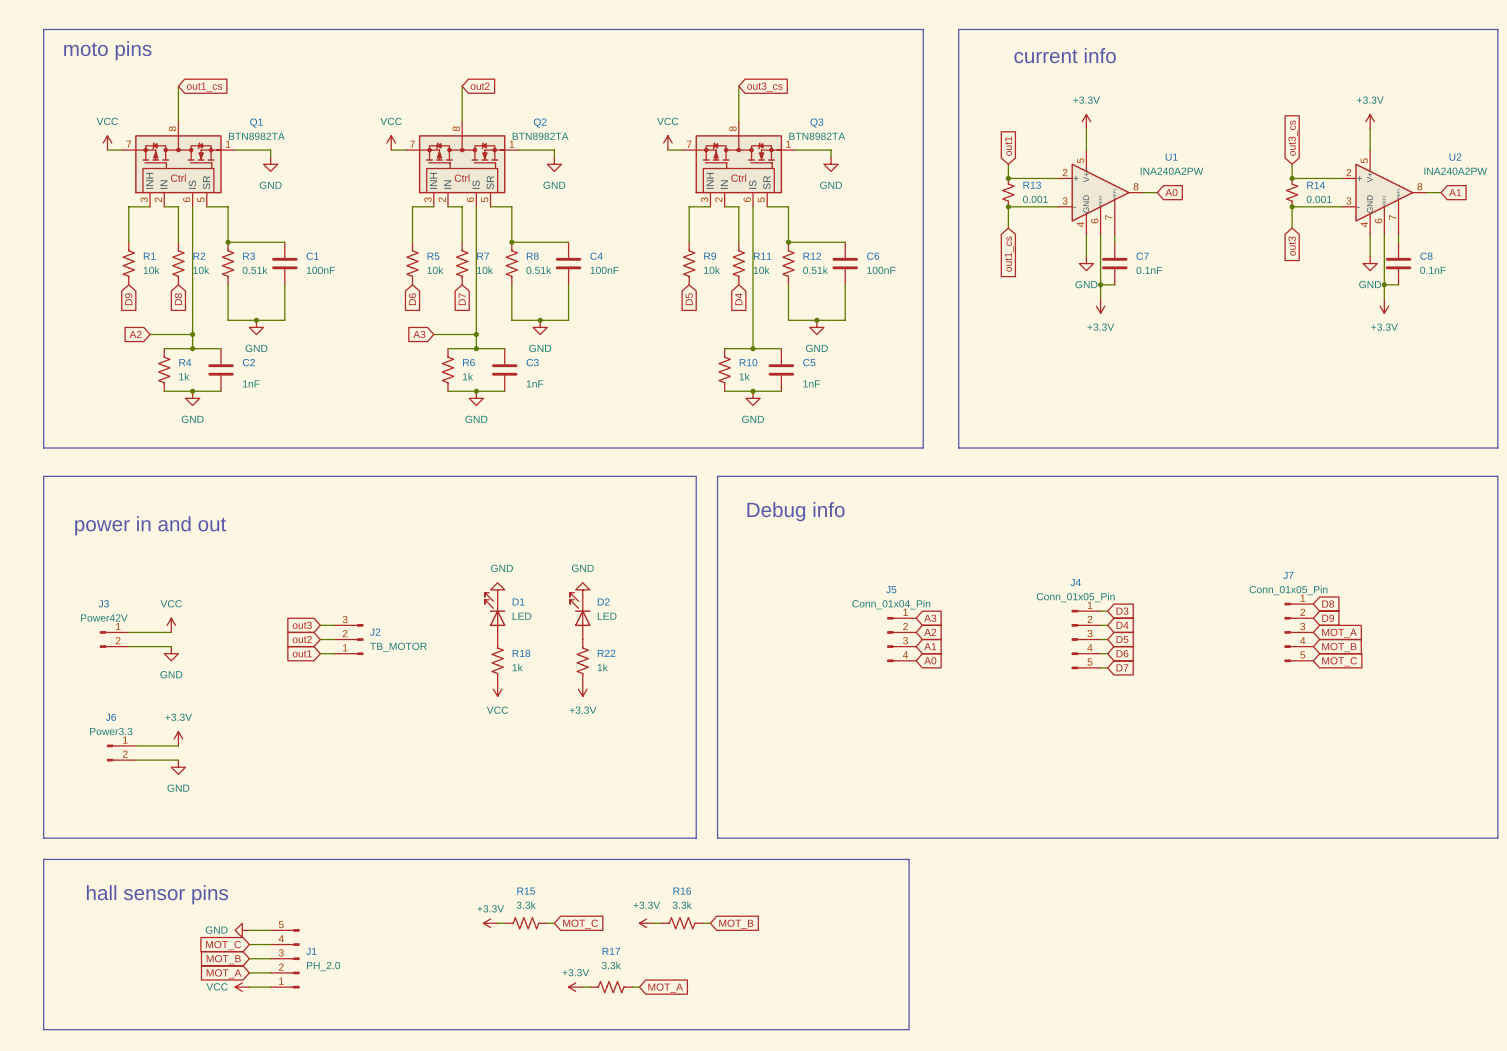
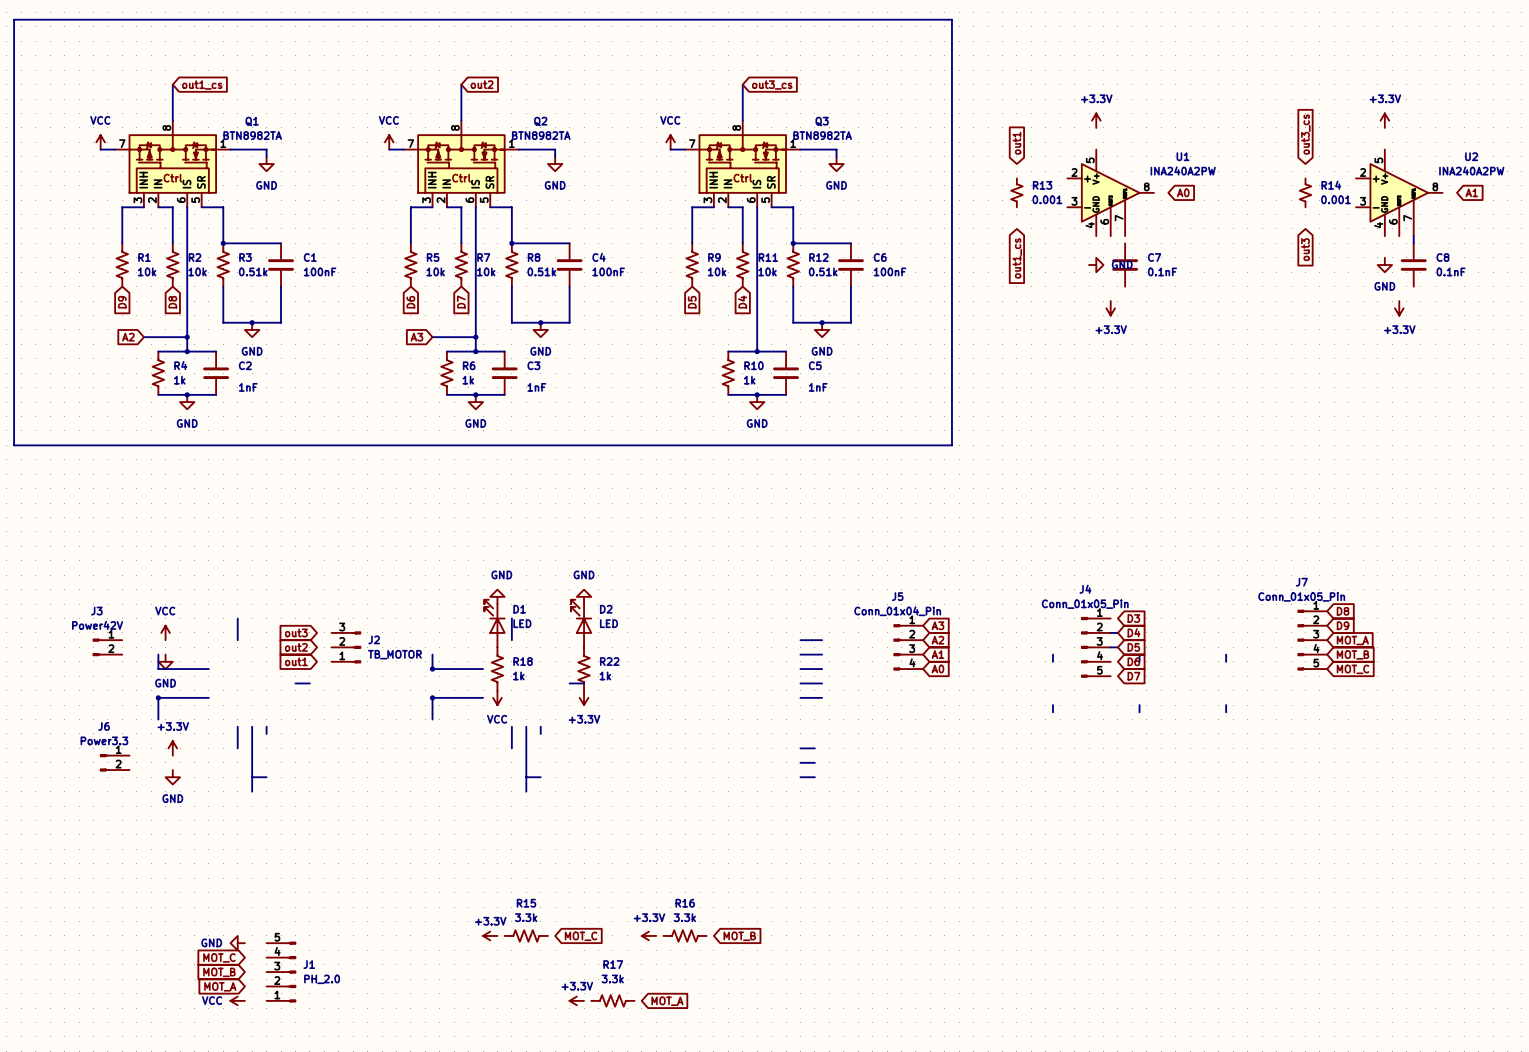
bus: none -> (14, 19) (951, 19) (951, 445) (14, 445) (14, 19)
line: (43, 29) (43, 448) (923, 448) (923, 29) (43, 29) -> none
line: (958, 29) (958, 448) (1497, 448) (1497, 29) (958, 29) -> none
text: moto pins (107, 50) -> none
text: current info (1065, 55) -> none
wire: (1086, 128) (1086, 150) -> none
wire: (1370, 128) (1370, 150) -> none
wire: (1008, 164) (1008, 178) (1058, 178) -> none
wire: (1292, 164) (1292, 178) (1341, 178) -> none
junction: (1008, 178) -> none
junction: (1292, 178) -> none
wire: (1143, 192) (1157, 192) -> none
wire: (1426, 192) (1441, 192) -> none
junction: (1008, 206) -> none
wire: (1058, 206) (1008, 206) (1008, 228) -> none
junction: (1292, 206) -> none
wire: (1341, 206) (1292, 206) (1292, 228) -> none
wire: (1086, 235) (1086, 256) -> none
wire: (1100, 235) (1100, 299) -> none
wire: (1114, 235) (1114, 242) -> none
wire: (1370, 235) (1370, 256) -> none
wire: (1384, 235) (1384, 299) -> none
power symbol rotation: 0° (1086, 263) -> 90° counterclockwise (1096, 265)
wire: (1100, 284) (1114, 284) -> none
junction: (1100, 284) -> none
wire: (1384, 284) (1398, 284) -> none
junction: (1384, 284) -> none
line: (43, 476) (43, 838) (696, 838) (696, 476) (43, 476) -> none
line: (717, 476) (717, 838) (1497, 838) (1497, 476) (717, 476) -> none
text: Debug info (795, 511) -> none
text: power in and out (150, 525) -> none
wire: none -> (237, 618) (237, 640)
wire: none -> (511, 618) (511, 640)
wire: (1100, 611) (1107, 611) -> none
wire: (320, 625) (334, 625) -> none
wire: (128, 632) (171, 632) -> none
wire: none -> (800, 640) (822, 640)
wire: (320, 639) (334, 639) -> none
wire: (128, 646) (171, 646) -> none
wire: none -> (158, 654) (158, 669) (208, 669)
wire: none -> (432, 654) (432, 669) (483, 669)
wire: none -> (800, 654) (822, 654)
wire: none -> (1052, 654) (1052, 661)
wire: none -> (1139, 654) (1139, 661)
wire: none -> (1226, 654) (1226, 661)
wire: (320, 653) (334, 653) -> (295, 683) (309, 683)
wire: (1100, 653) (1107, 653) -> none
junction: none -> (432, 669)
wire: none -> (800, 669) (822, 669)
wire: (1100, 667) (1107, 667) -> none
wire: none -> (569, 683) (584, 683)
wire: none -> (800, 683) (822, 683)
junction: none -> (158, 697)
wire: none -> (208, 697) (158, 697) (158, 719)
junction: none -> (432, 697)
wire: none -> (483, 697) (432, 697) (432, 719)
wire: none -> (800, 697) (822, 697)
wire: none -> (1052, 705) (1052, 712)
wire: none -> (1139, 705) (1139, 712)
wire: none -> (1226, 705) (1226, 712)
wire: none -> (237, 726) (237, 748)
wire: none -> (252, 726) (252, 791)
wire: none -> (266, 726) (266, 733)
wire: none -> (511, 726) (511, 748)
wire: none -> (526, 726) (526, 791)
wire: none -> (540, 726) (540, 733)
wire: none -> (800, 748) (814, 748)
wire: (135, 745) (178, 745) -> none
wire: none -> (800, 762) (814, 762)
wire: (135, 760) (178, 760) -> none
wire: none -> (252, 777) (266, 777)
wire: none -> (526, 777) (540, 777)
wire: none -> (800, 777) (814, 777)
line: (43, 859) (43, 1029) (909, 1029) (909, 859) (43, 859) -> none
text: hall sensor pins (157, 894) -> none
wire: (497, 923) (504, 923) -> none
wire: (547, 923) (554, 923) -> none
wire: (653, 923) (660, 923) -> none
wire: (703, 923) (710, 923) -> none
wire: (249, 930) (270, 930) -> none
wire: (249, 944) (270, 944) -> none
wire: (249, 958) (270, 958) -> none
wire: (249, 972) (270, 972) -> none
wire: (249, 987) (270, 987) -> none
wire: (582, 987) (589, 987) -> none
wire: (632, 987) (639, 987) -> none

